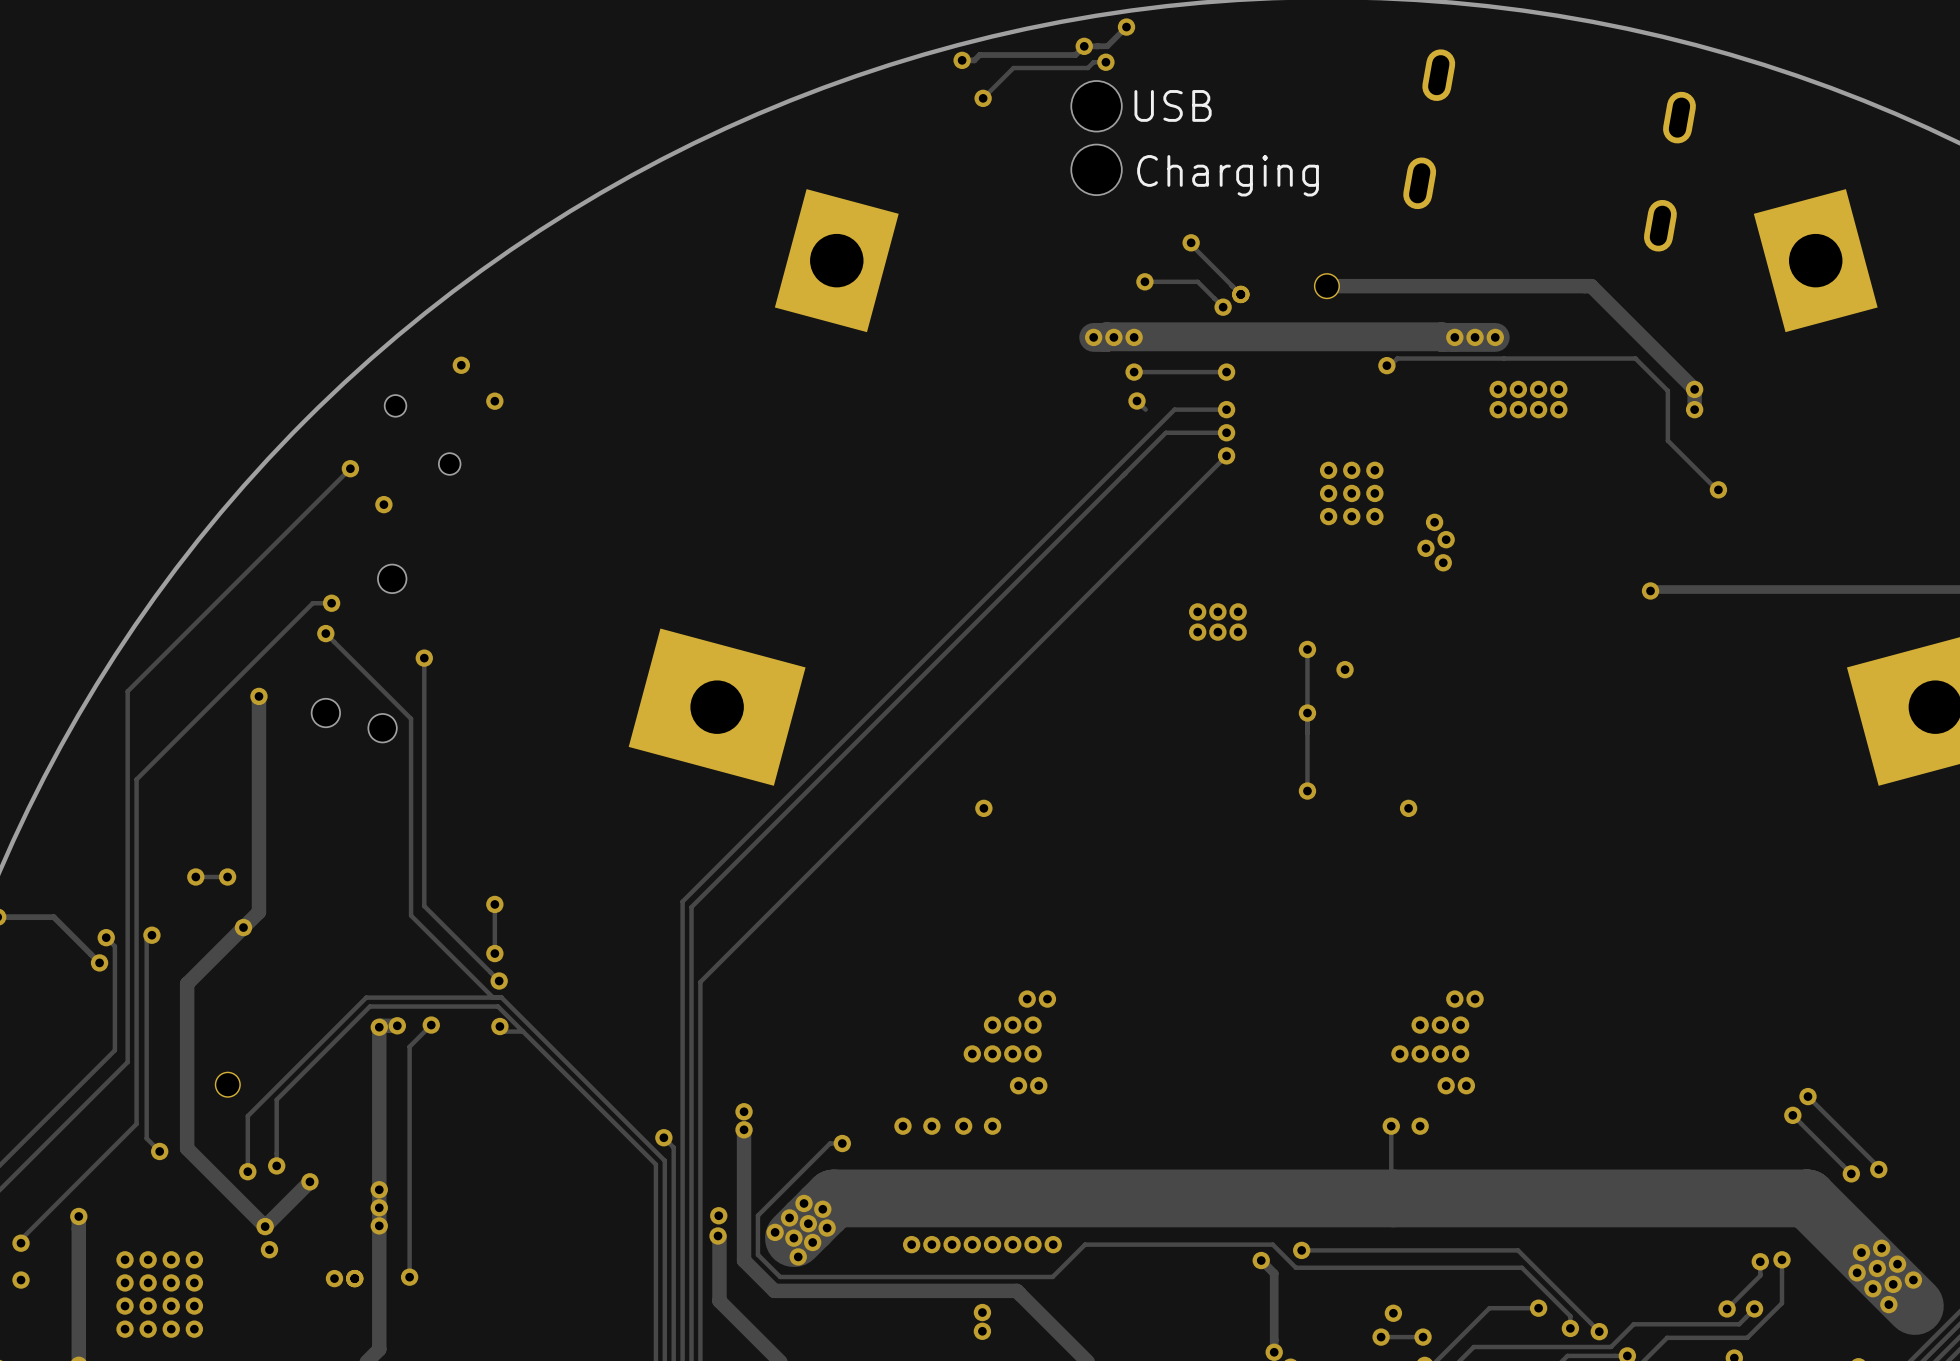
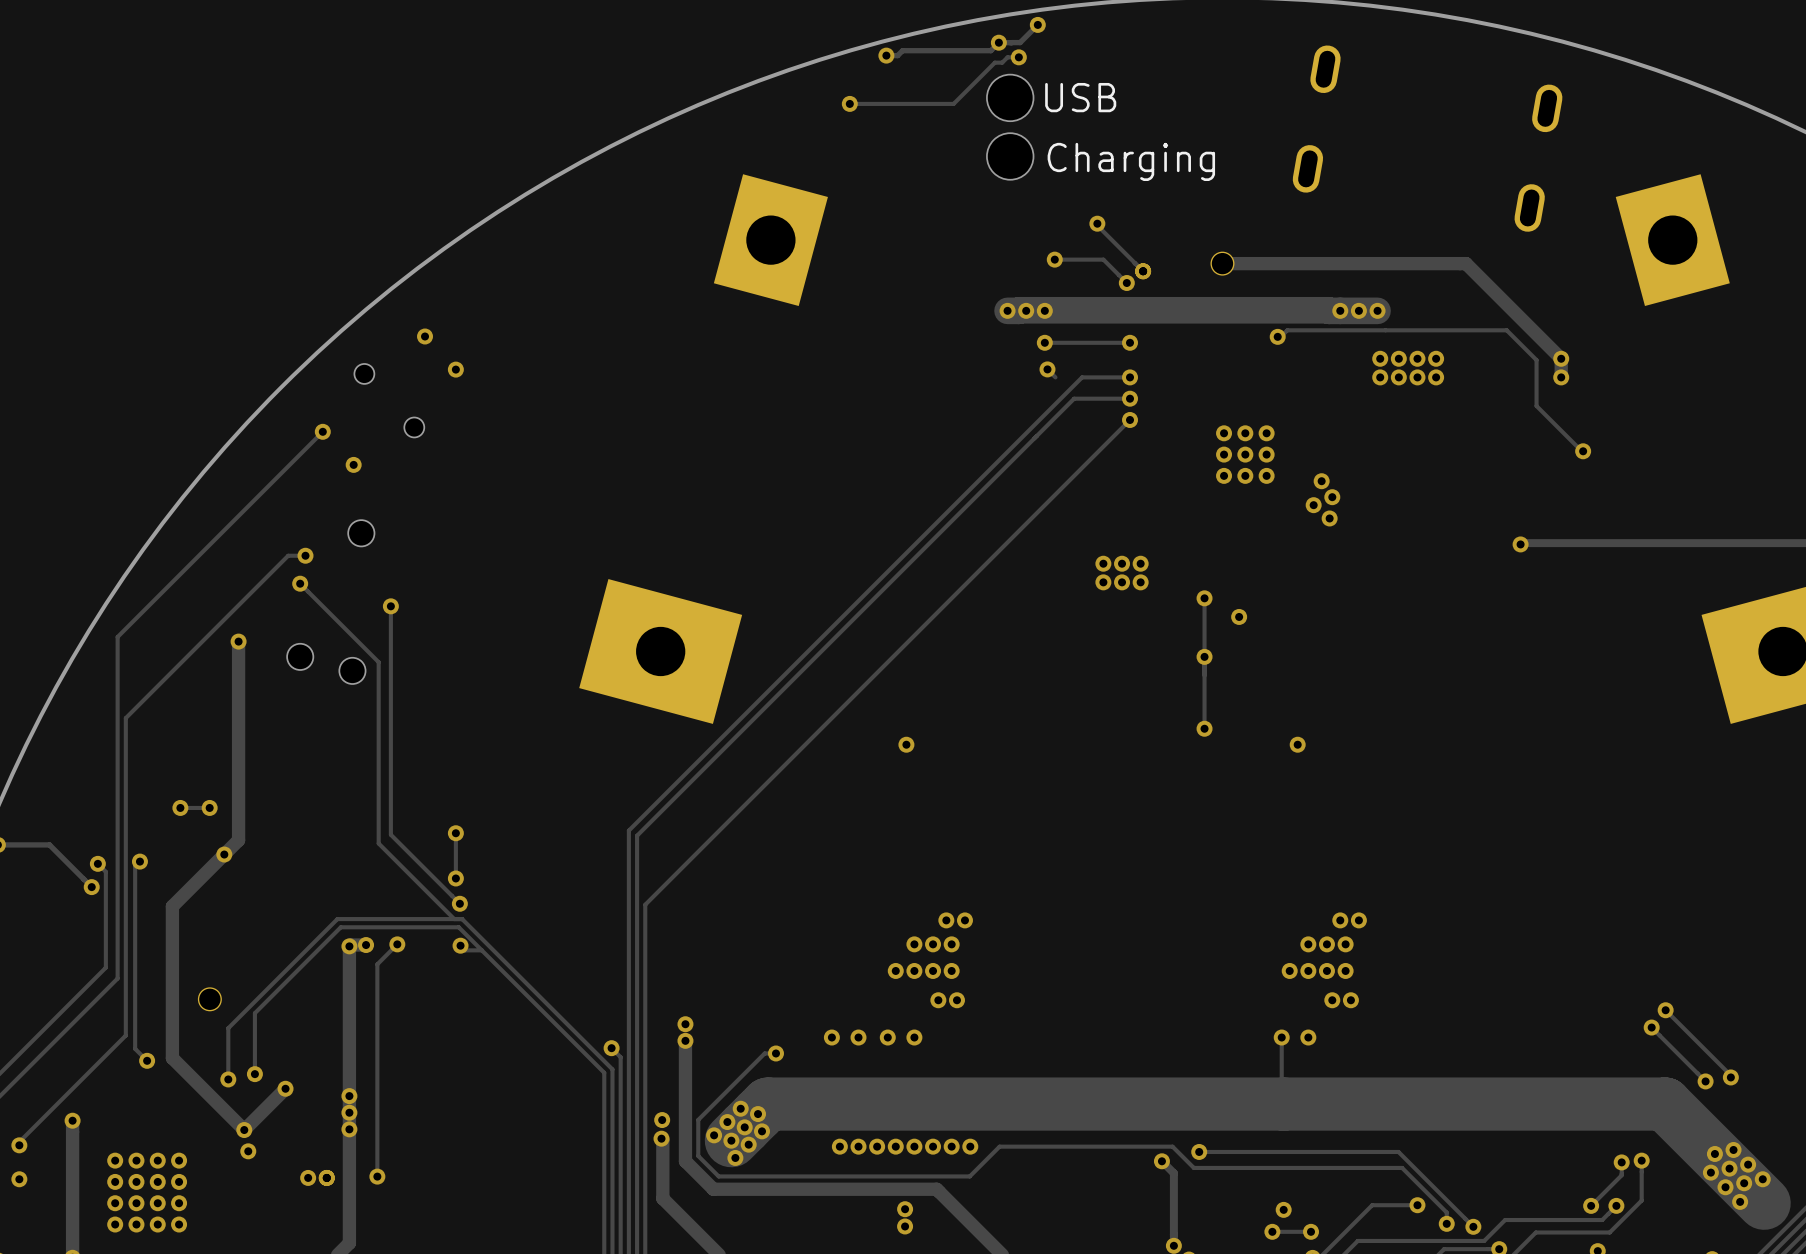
track: (1079, 68) (1013, 68) (983, 98) -> (994, 62) (953, 103) (849, 103)
via position: (983, 98) -> (849, 103)

